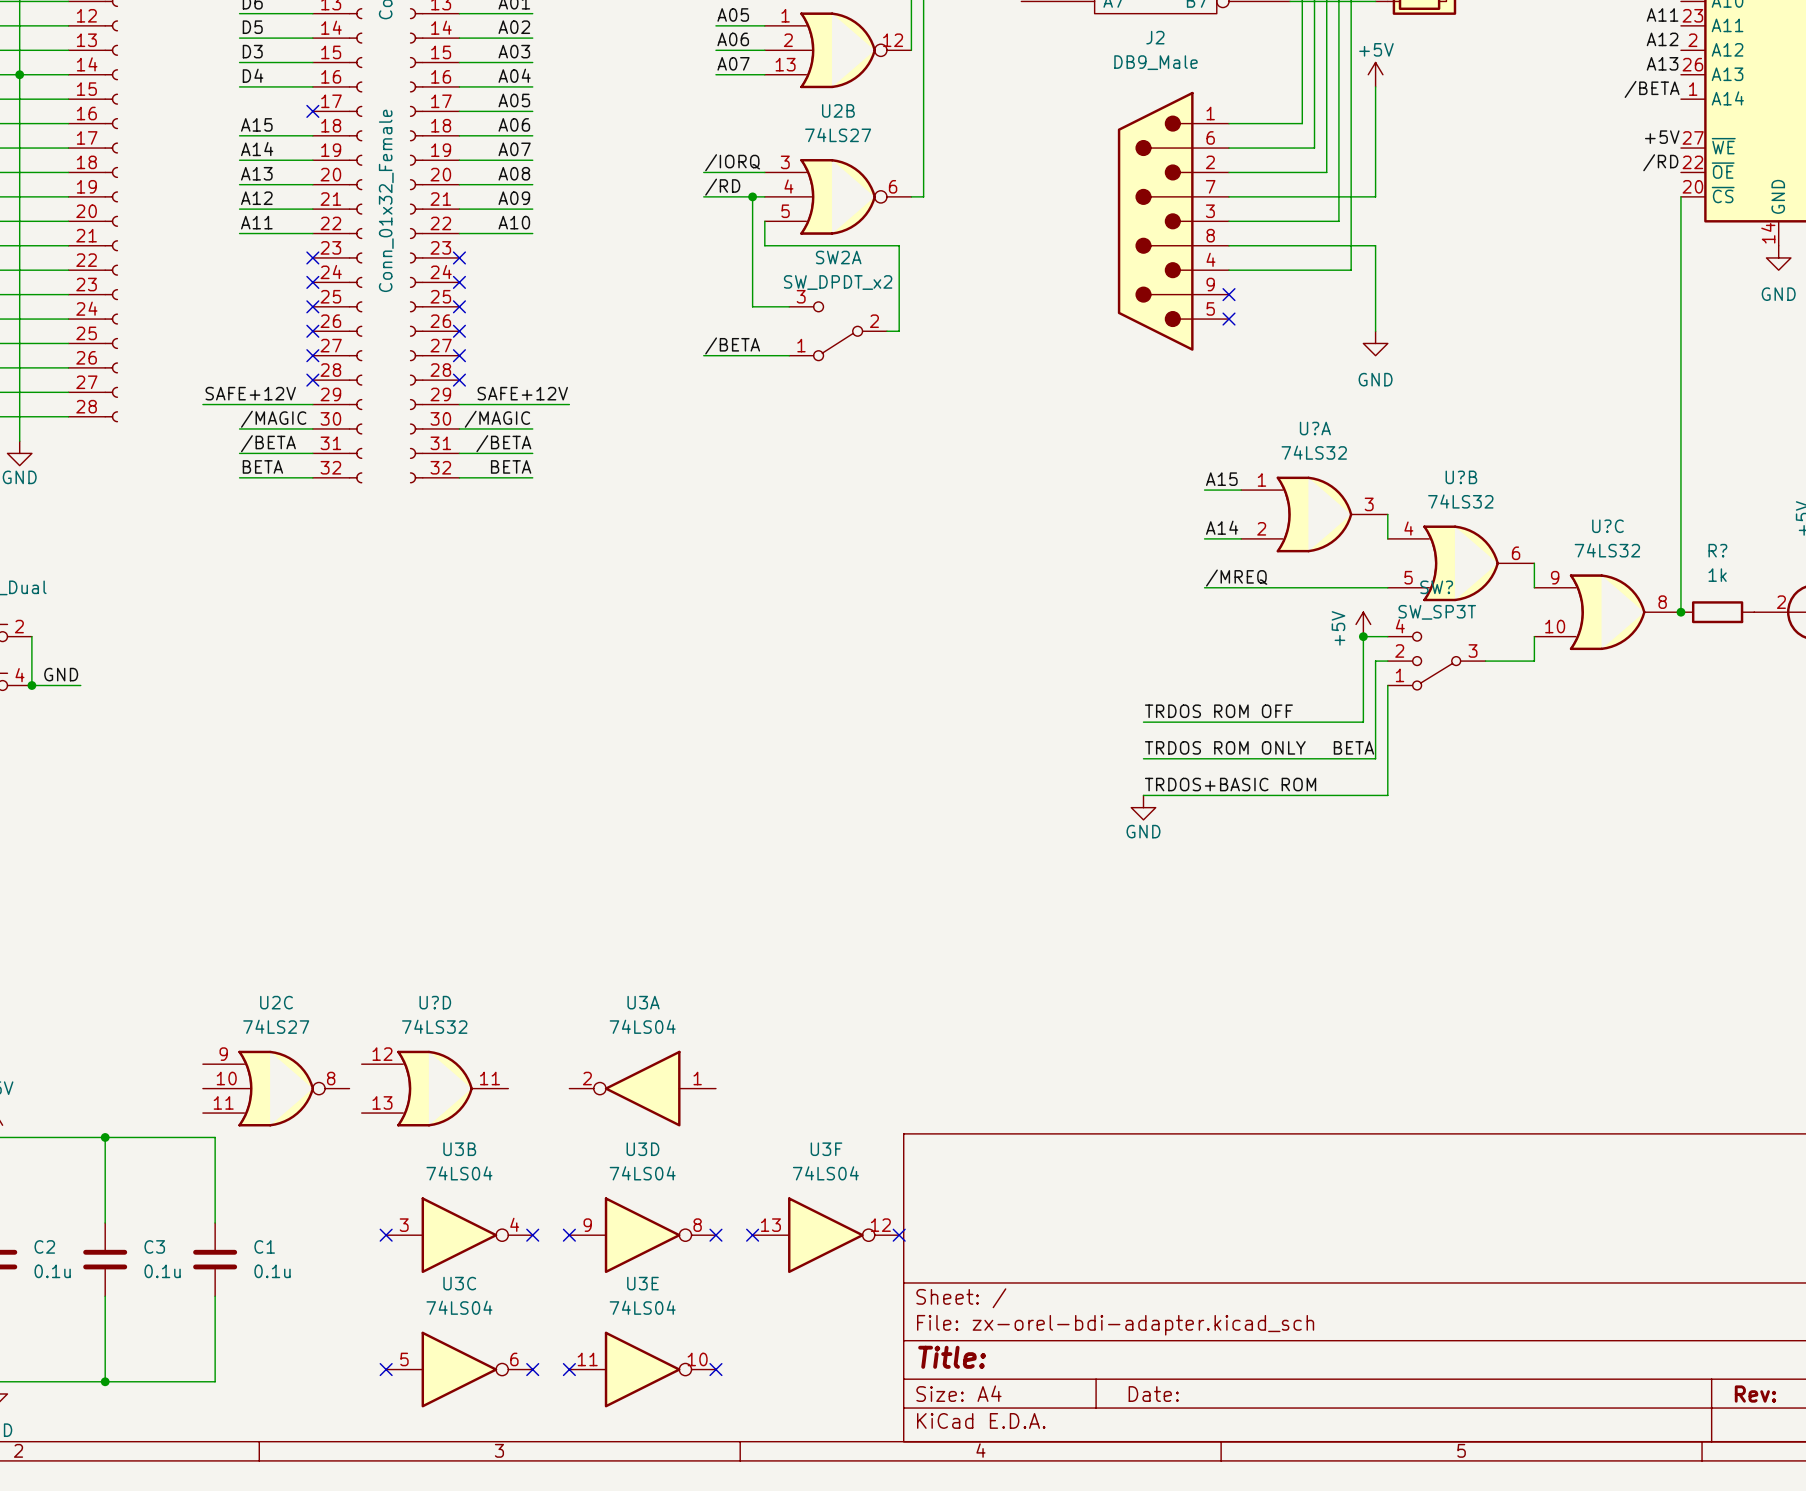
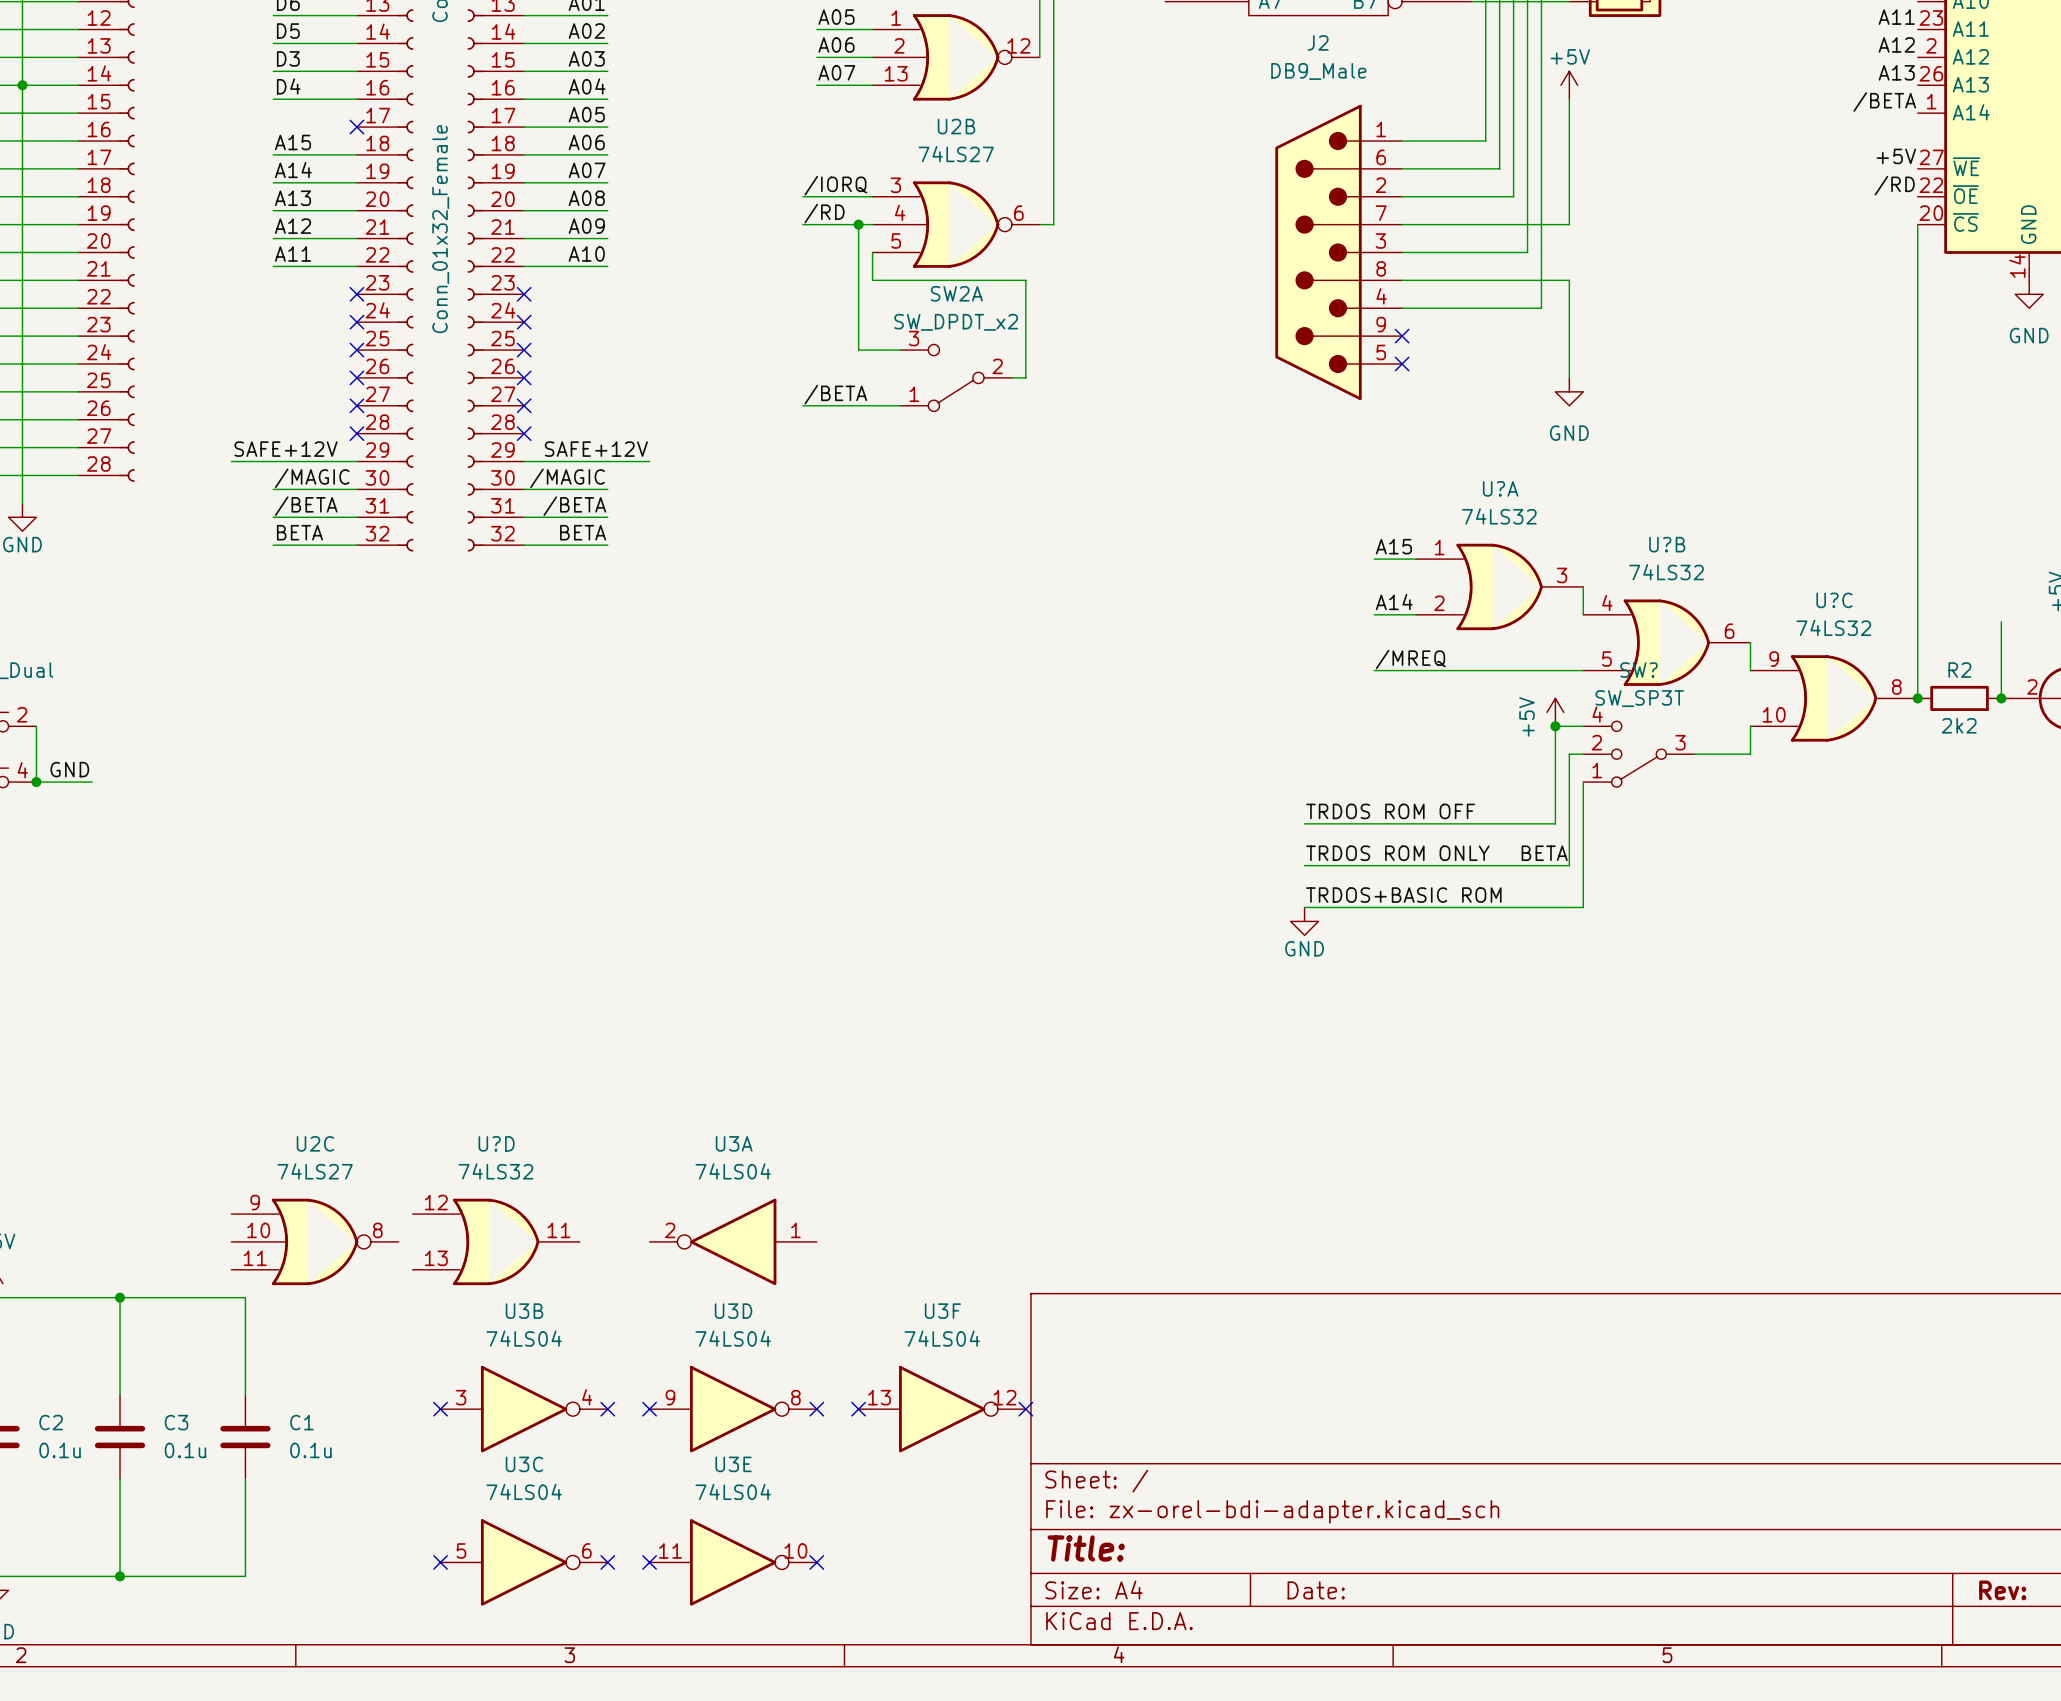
wire: none -> (2001, 621) (2001, 698)
R? name: R? (1717, 550) -> R2 (1959, 670)
R? value: 1k (1717, 575) -> 2k2 (1959, 725)
junction: none -> (2001, 698)

